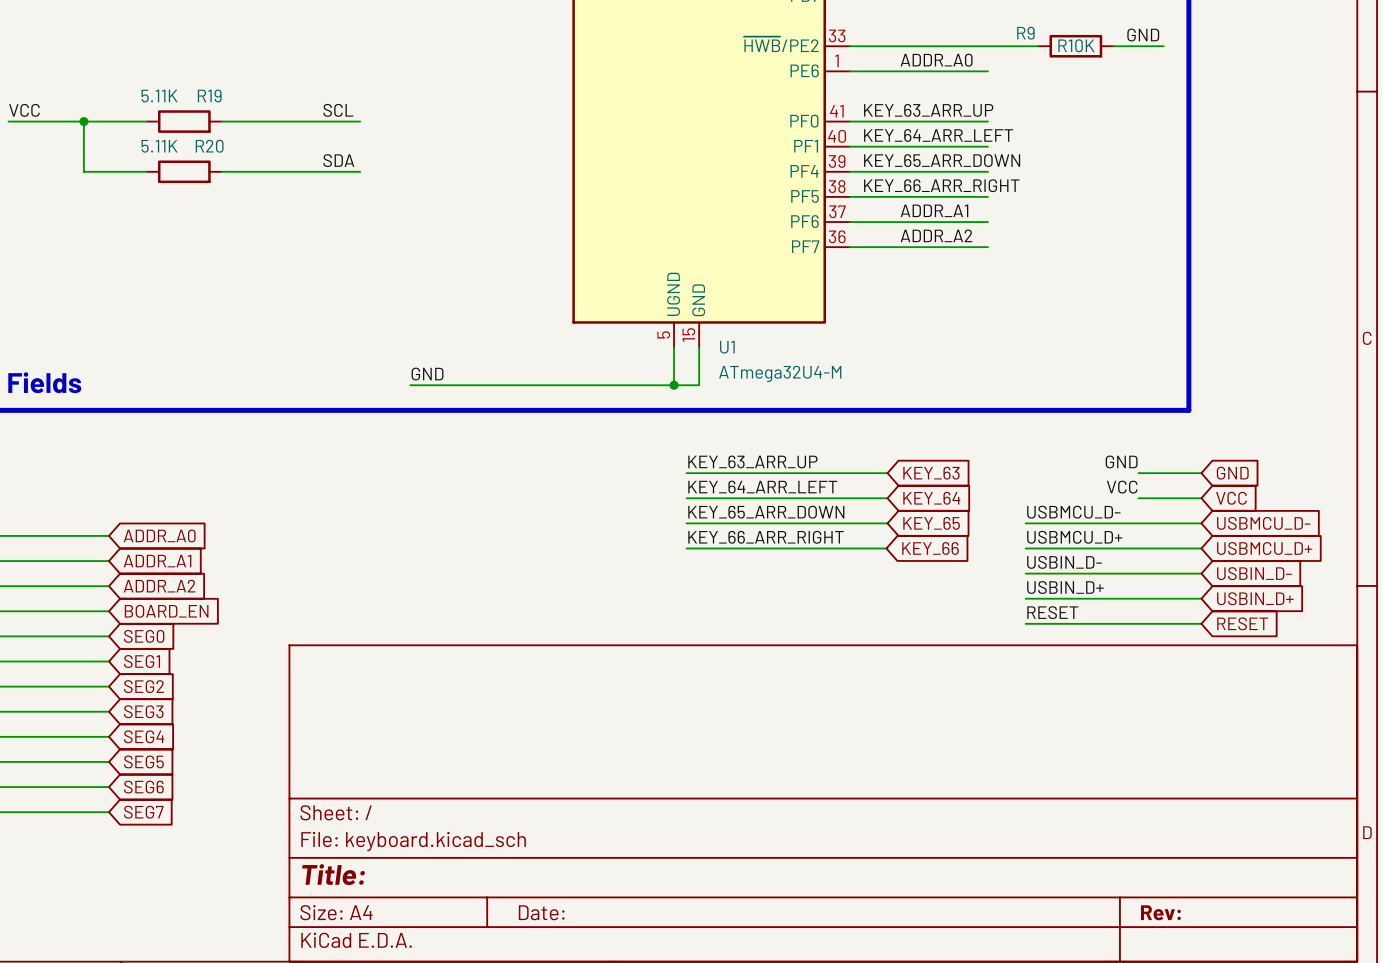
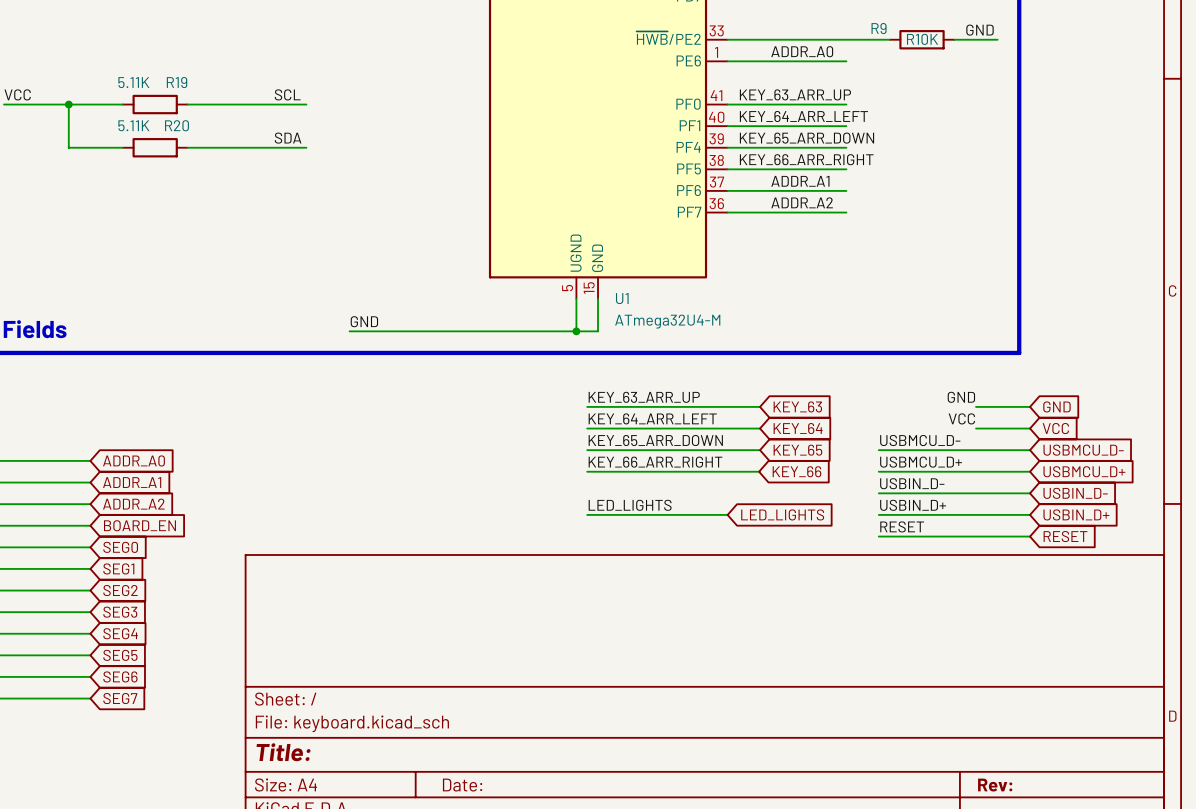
label: none -> LED_LIGHTS (630, 505)
wire: none -> (587, 514) (727, 514)
global label: none -> LED_LIGHTS (782, 514)

